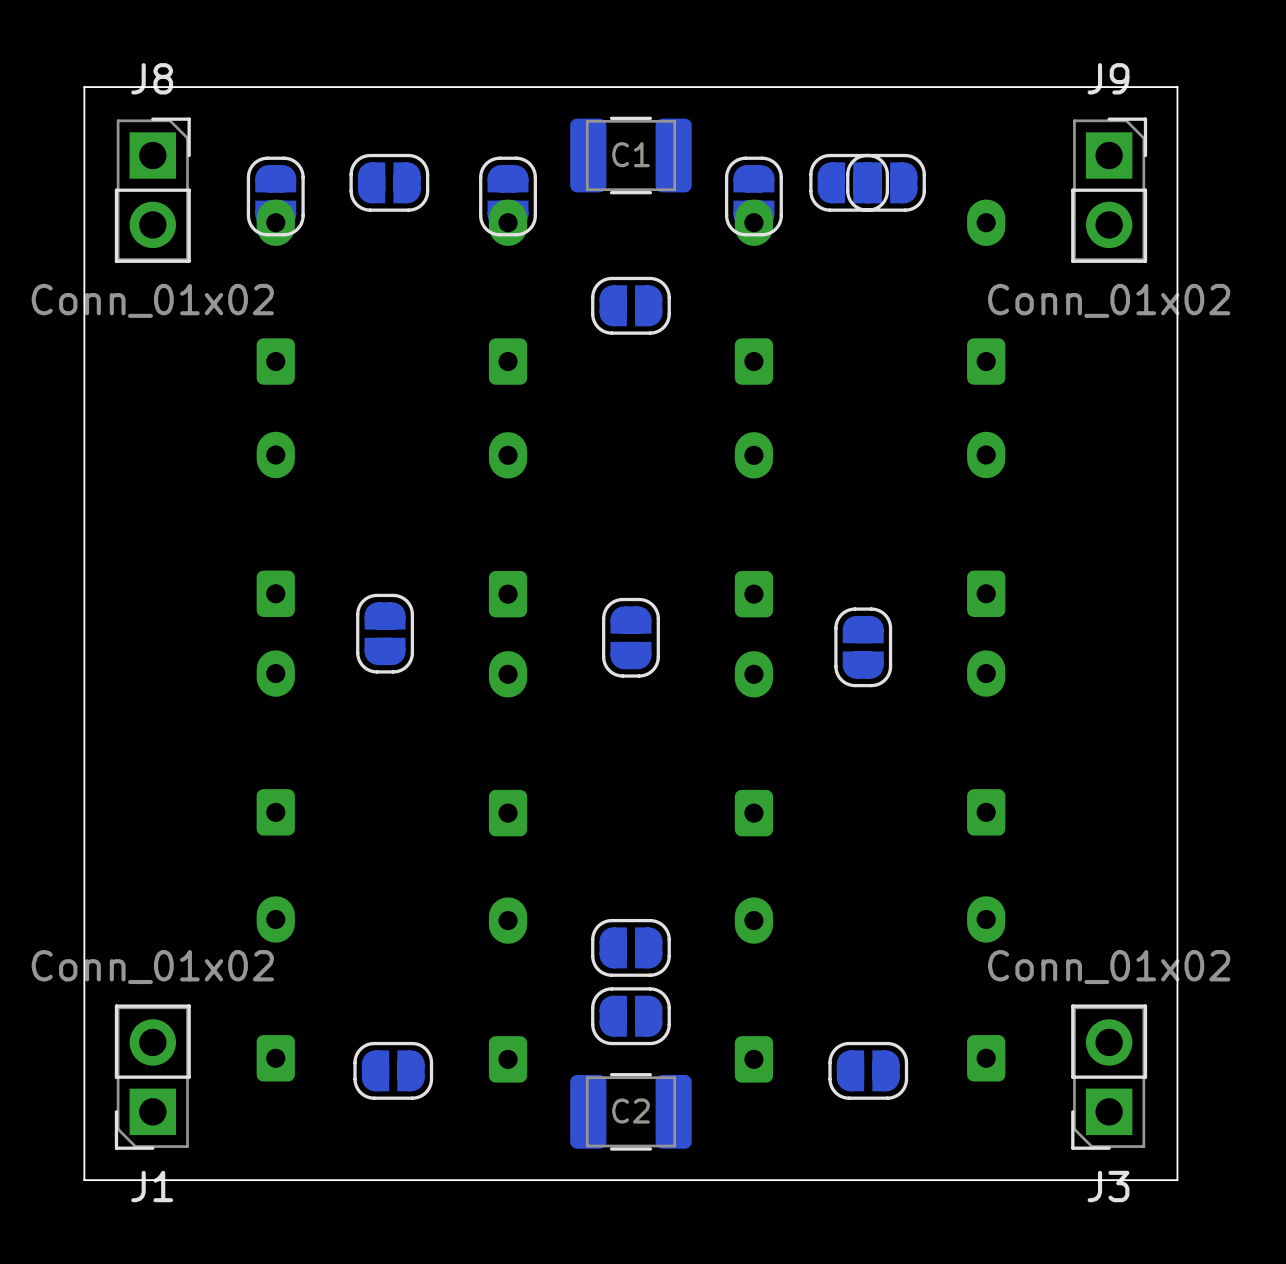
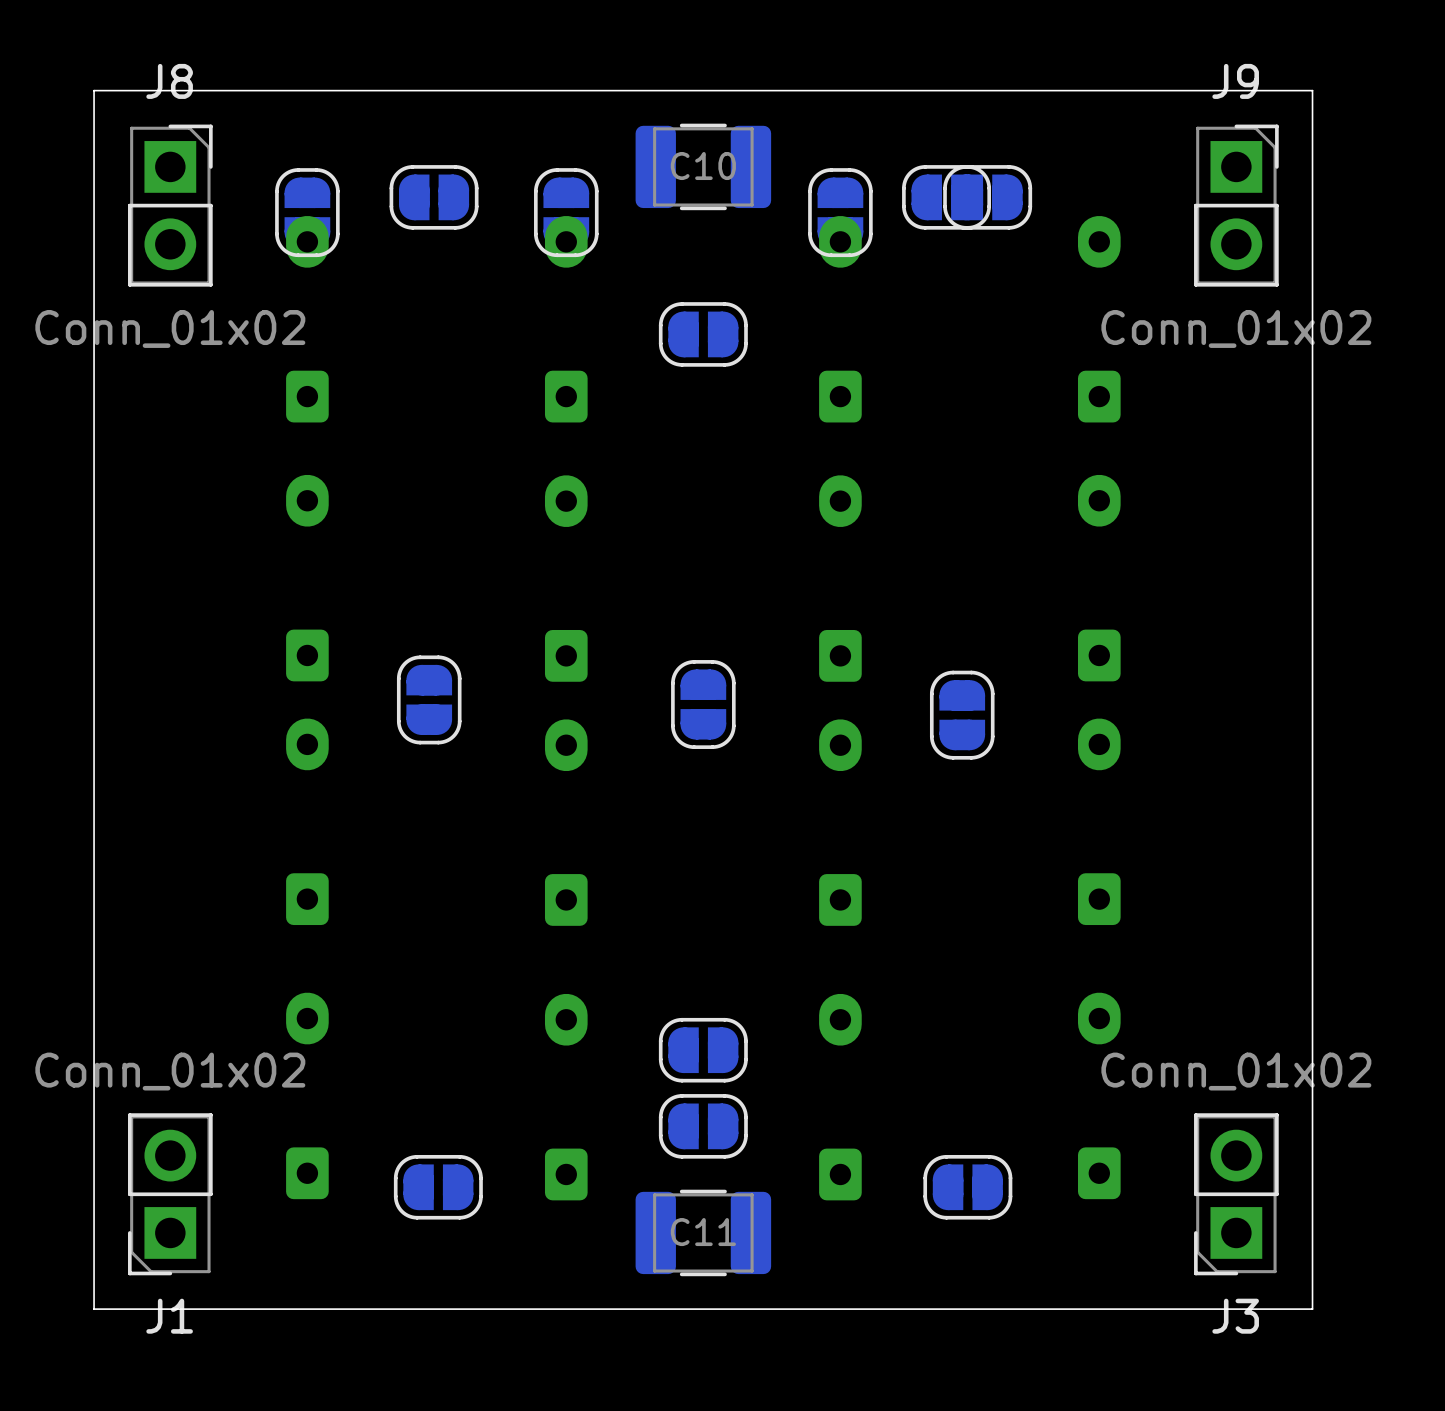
C1 name: C1 (630, 154) -> C10 (703, 166)
C2 name: C2 (630, 1111) -> C11 (703, 1232)

